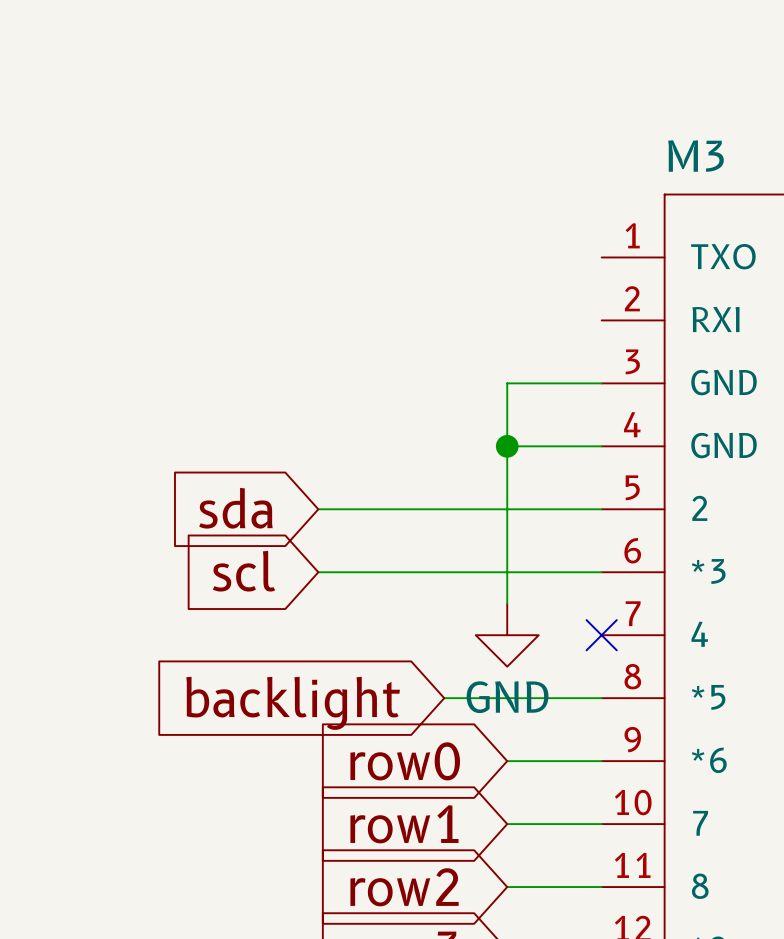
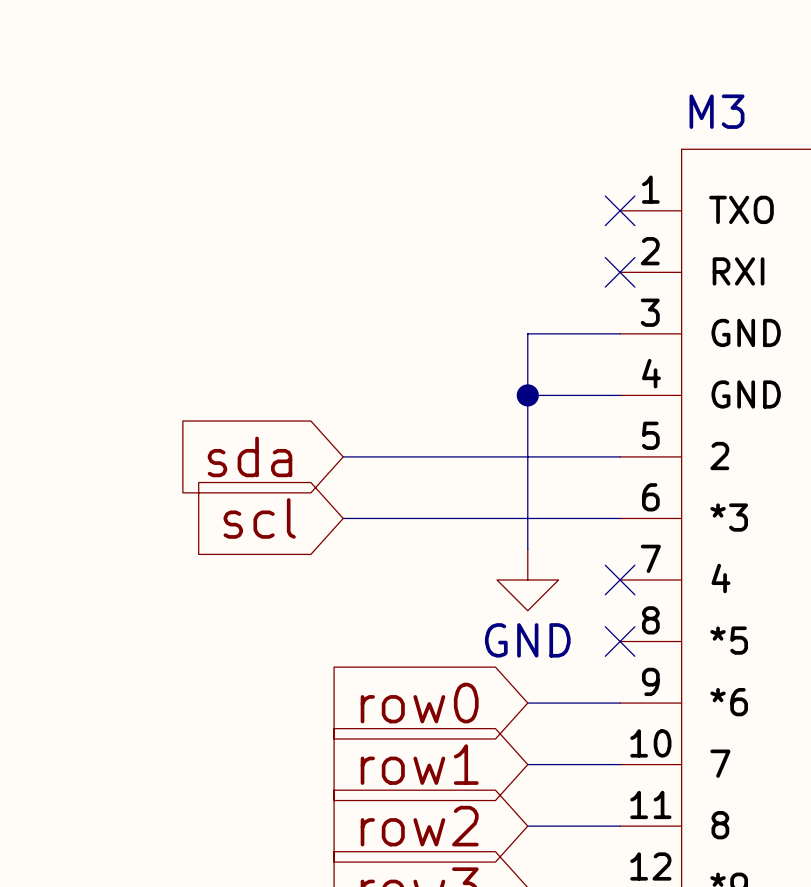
no-connect mark: none -> (620, 210)
no-connect mark: none -> (620, 272)
wire: (444, 698) (601, 698) -> none
no-connect mark: none -> (620, 641)
global label: backlight (293, 703) -> none

